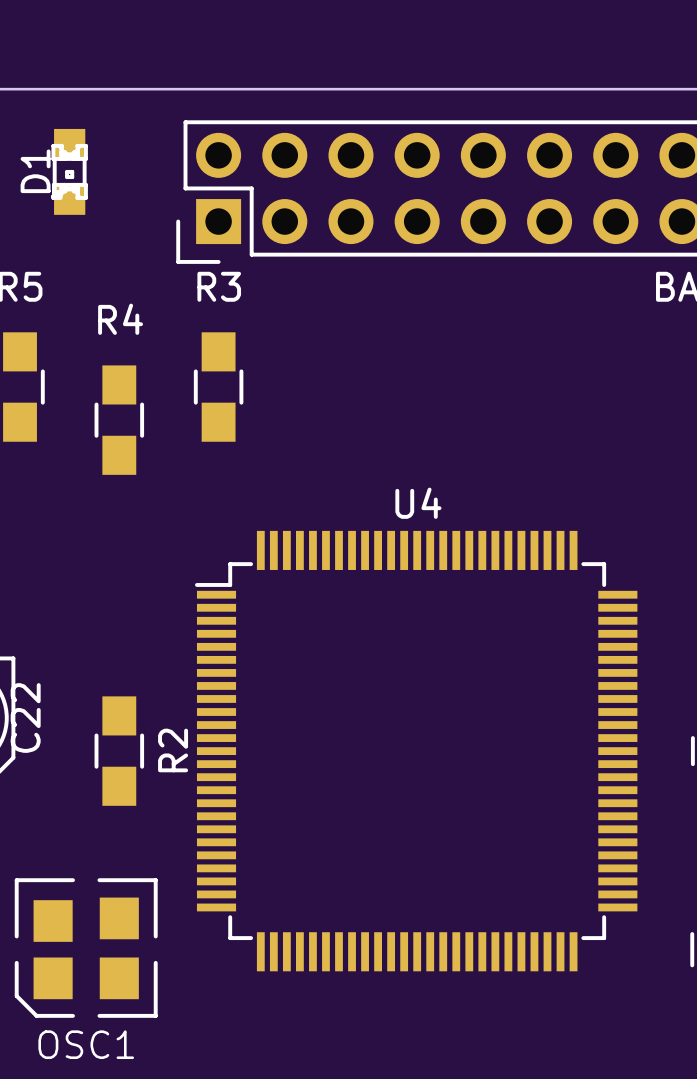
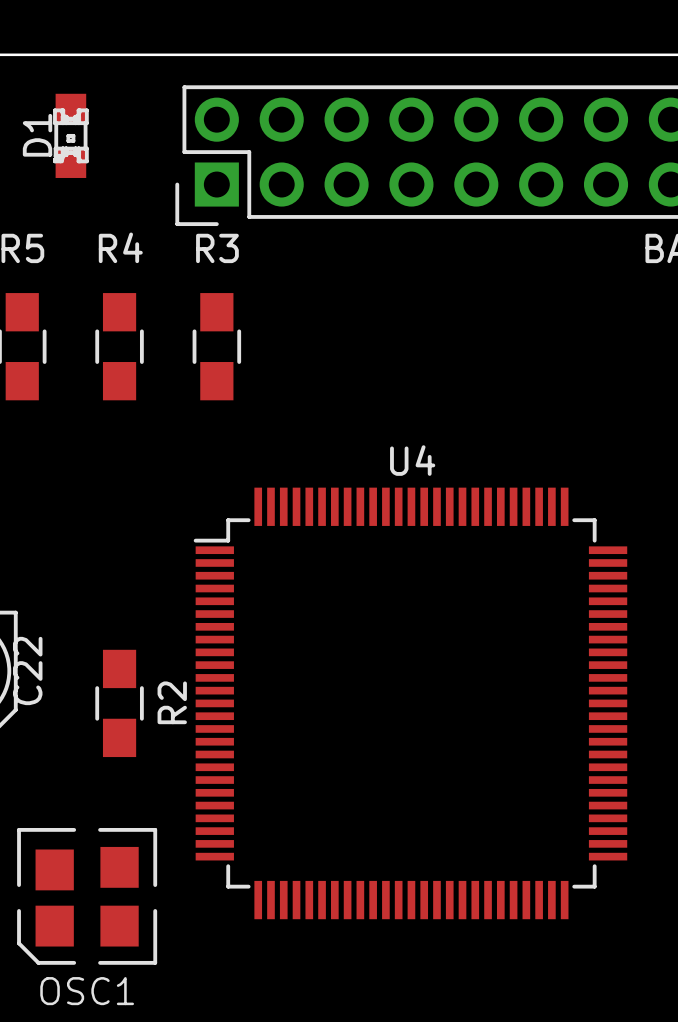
R4 position: (119, 420) -> (119, 346)

